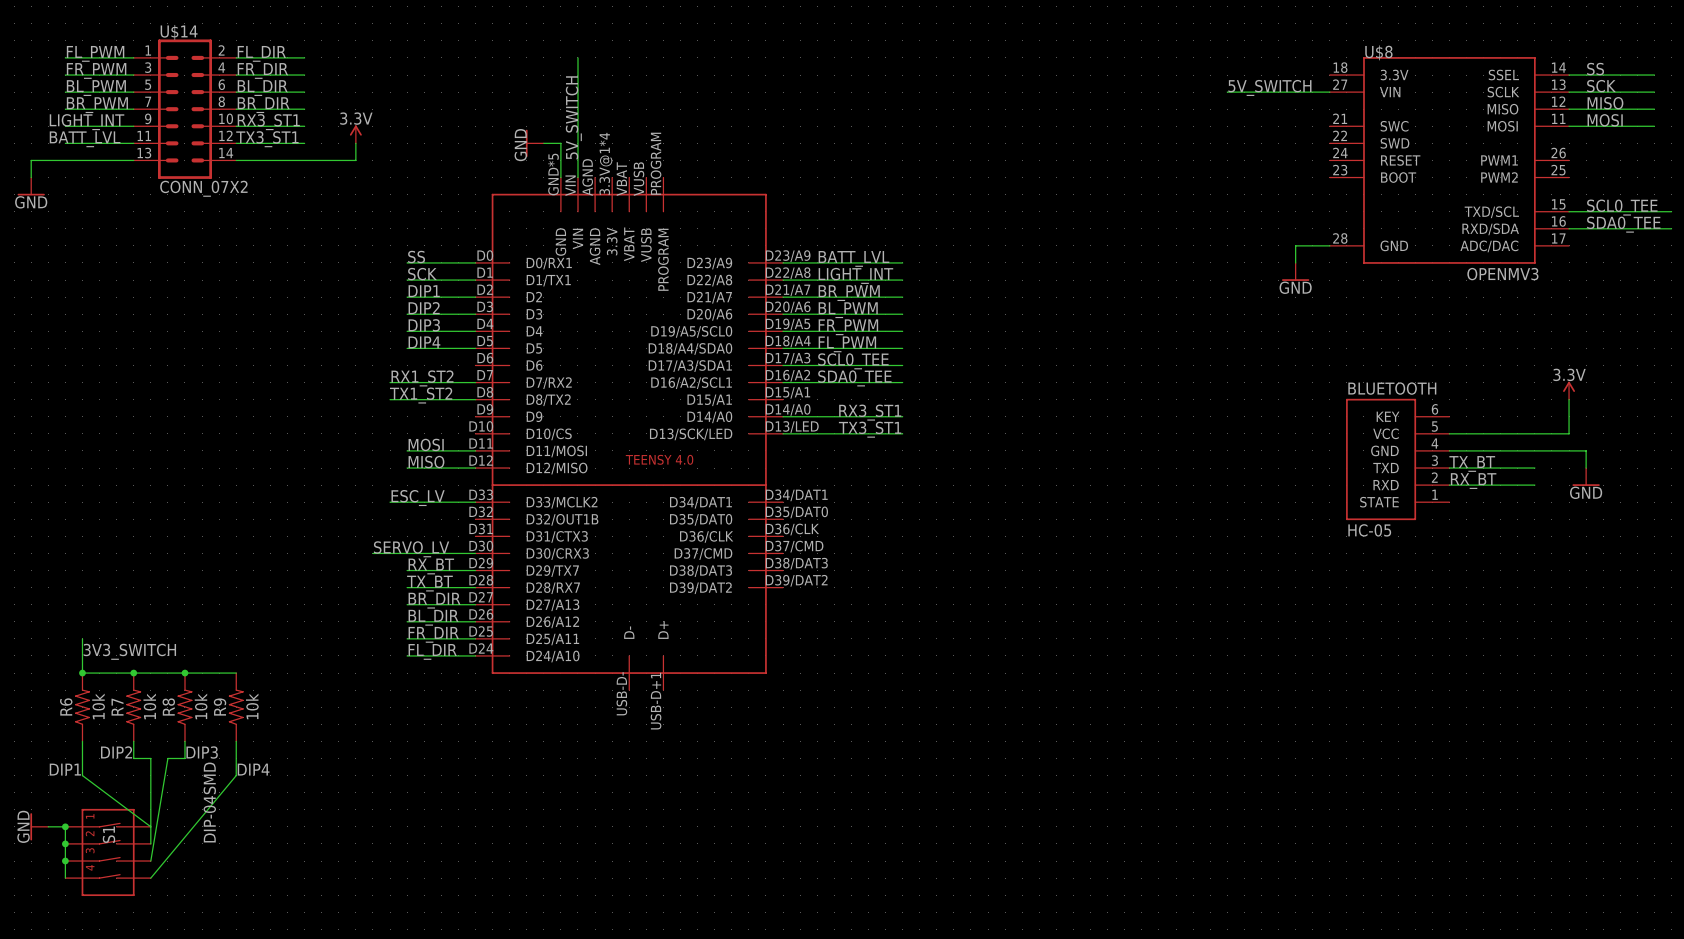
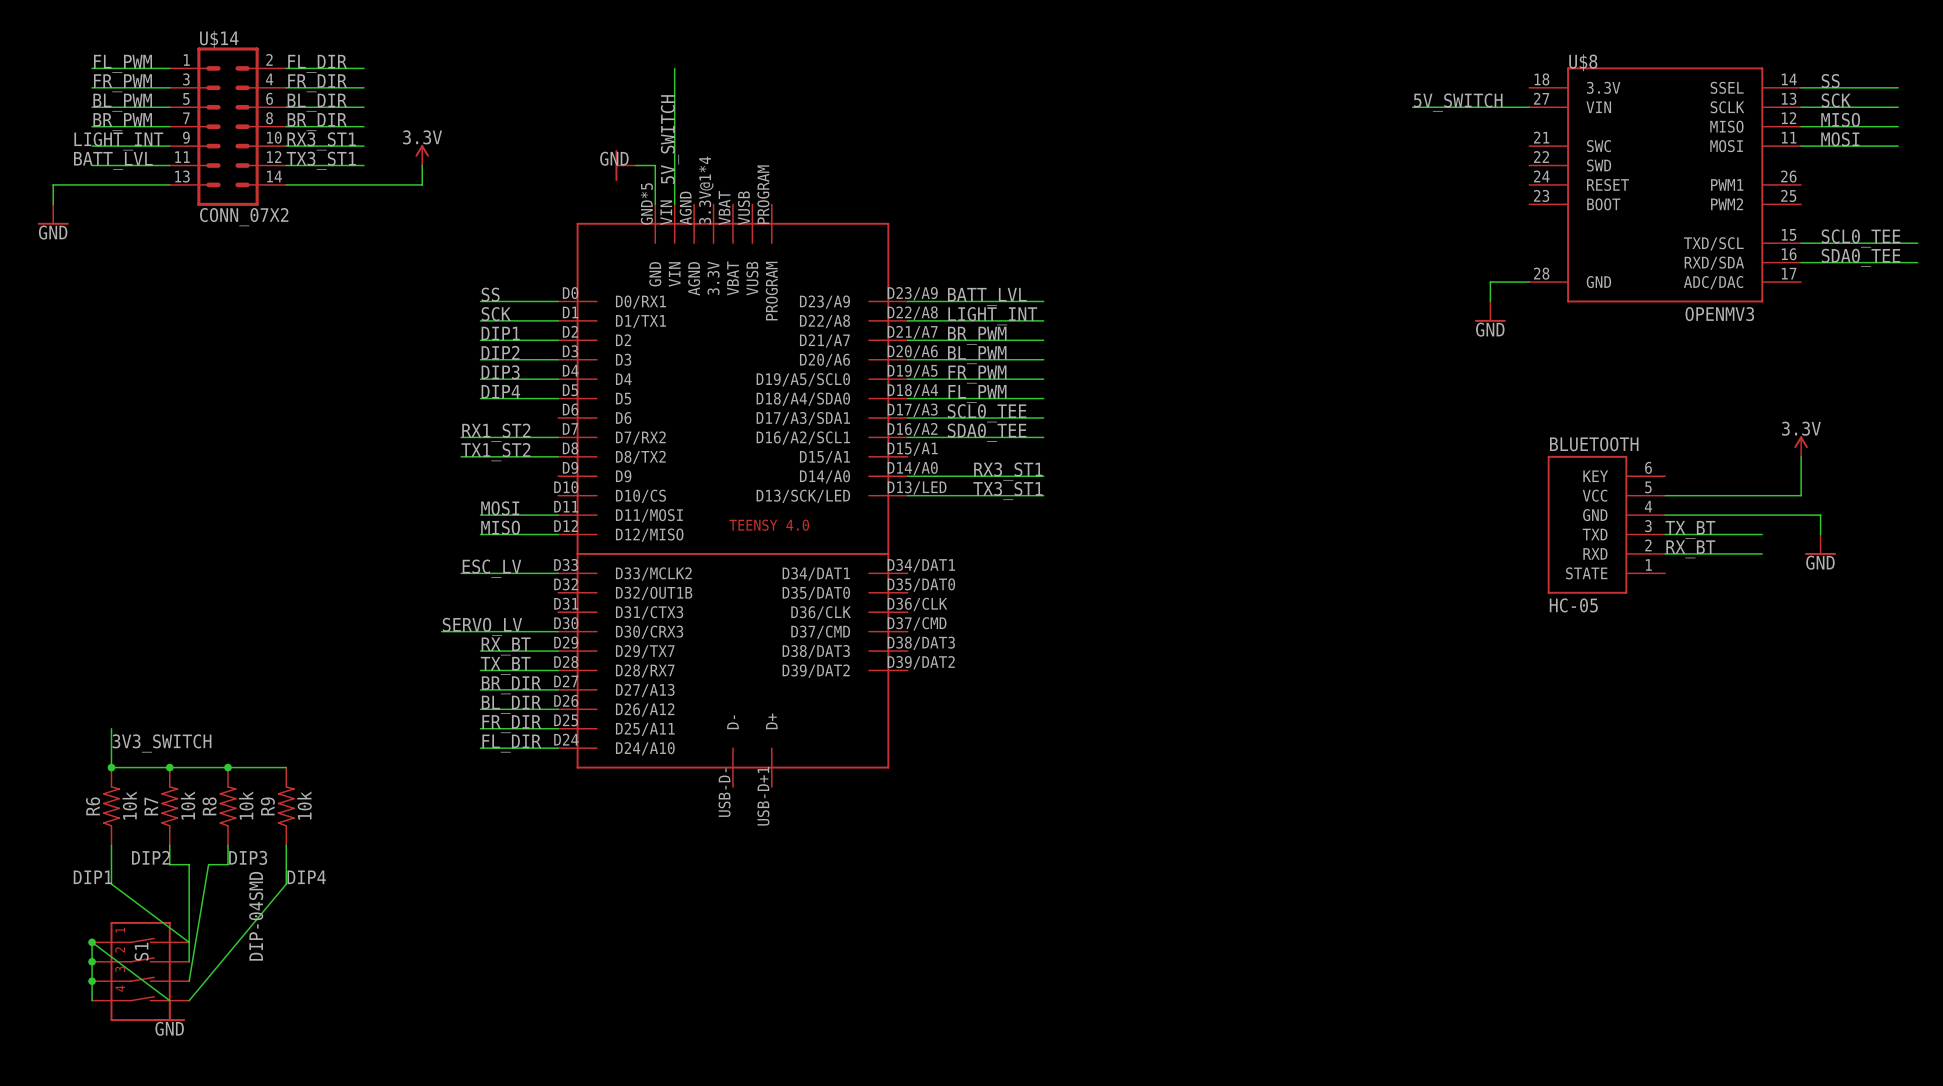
power symbol text rotation: 0° (520, 145) -> 90° clockwise (614, 158)
power symbol rotation: 0° (31, 826) -> 90° counterclockwise (169, 1020)
power symbol position: GND (39, 826) -> GND (169, 1010)
wire: (48, 826) (65, 826) -> (169, 1000) (92, 942)

